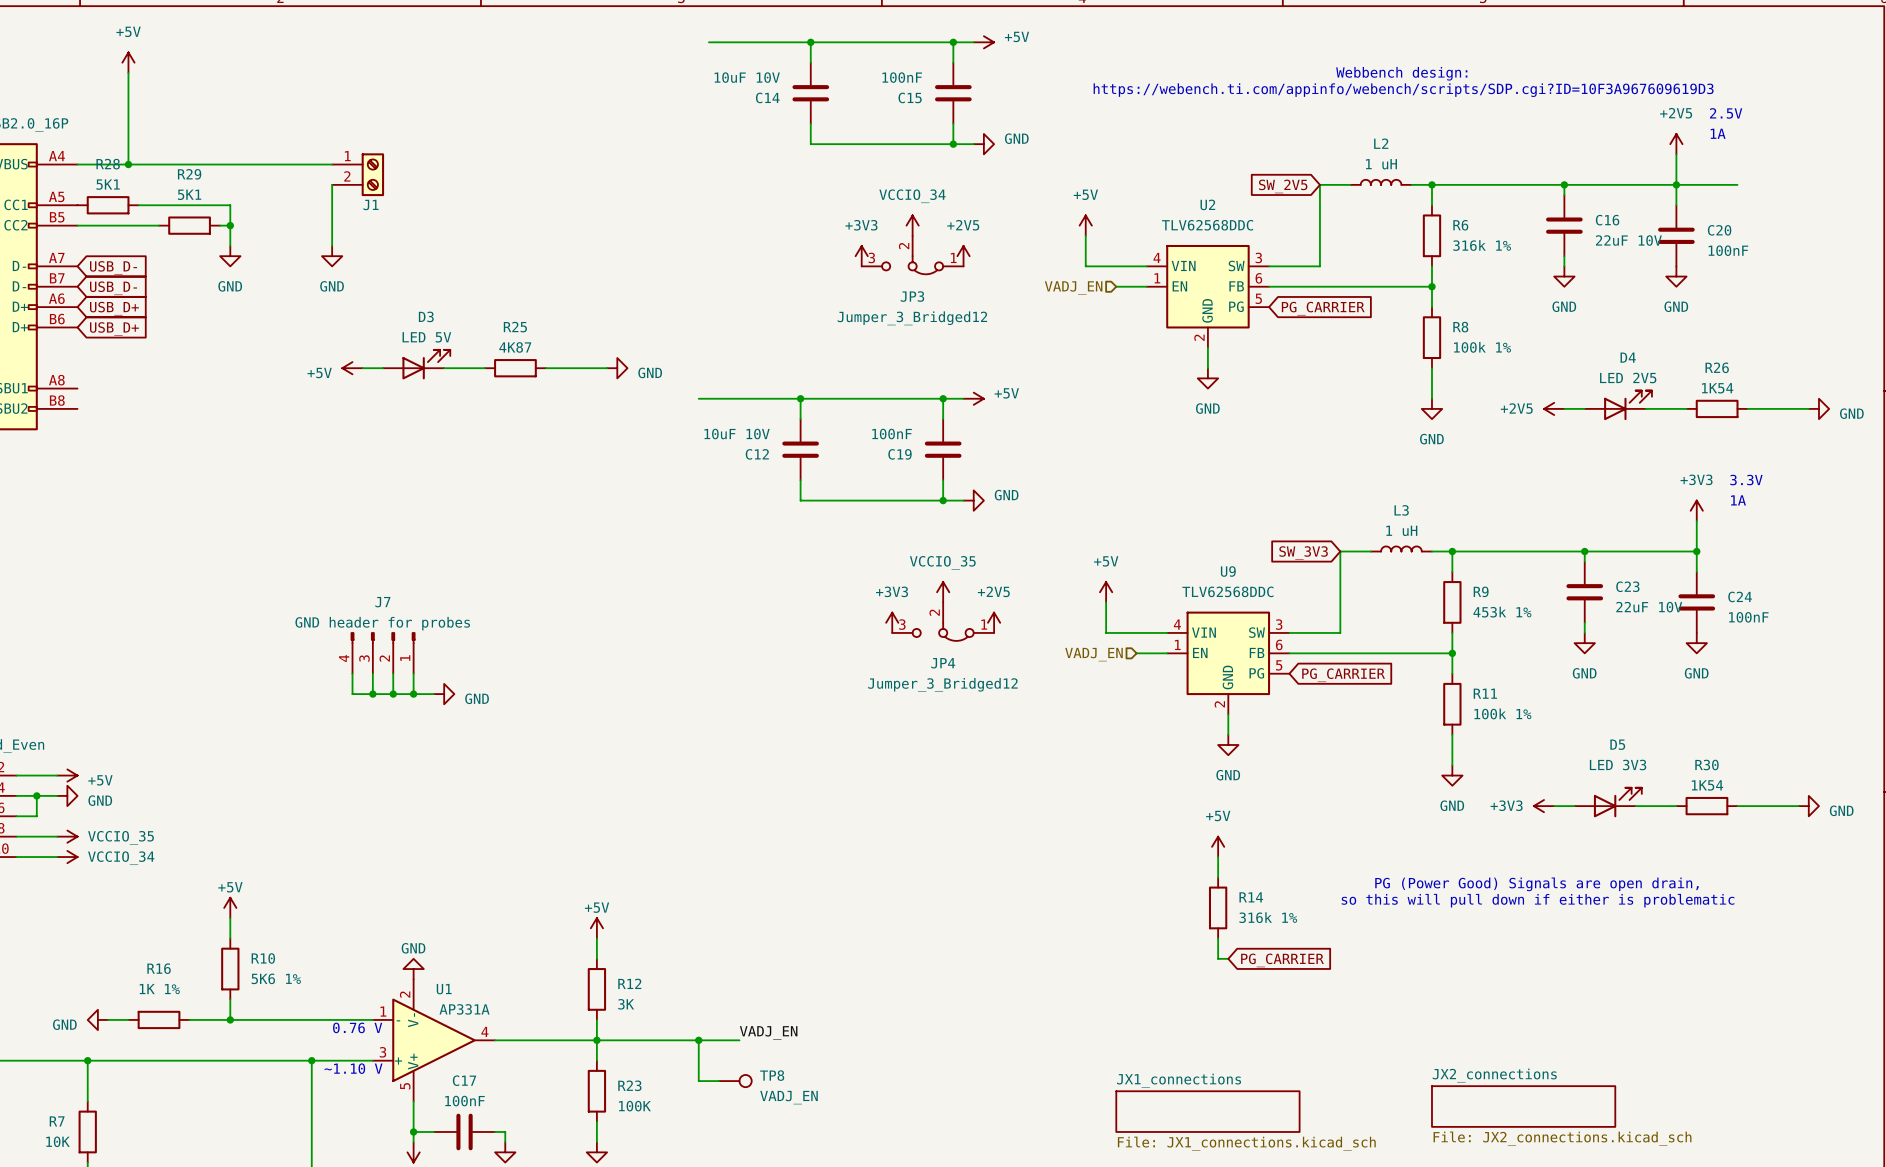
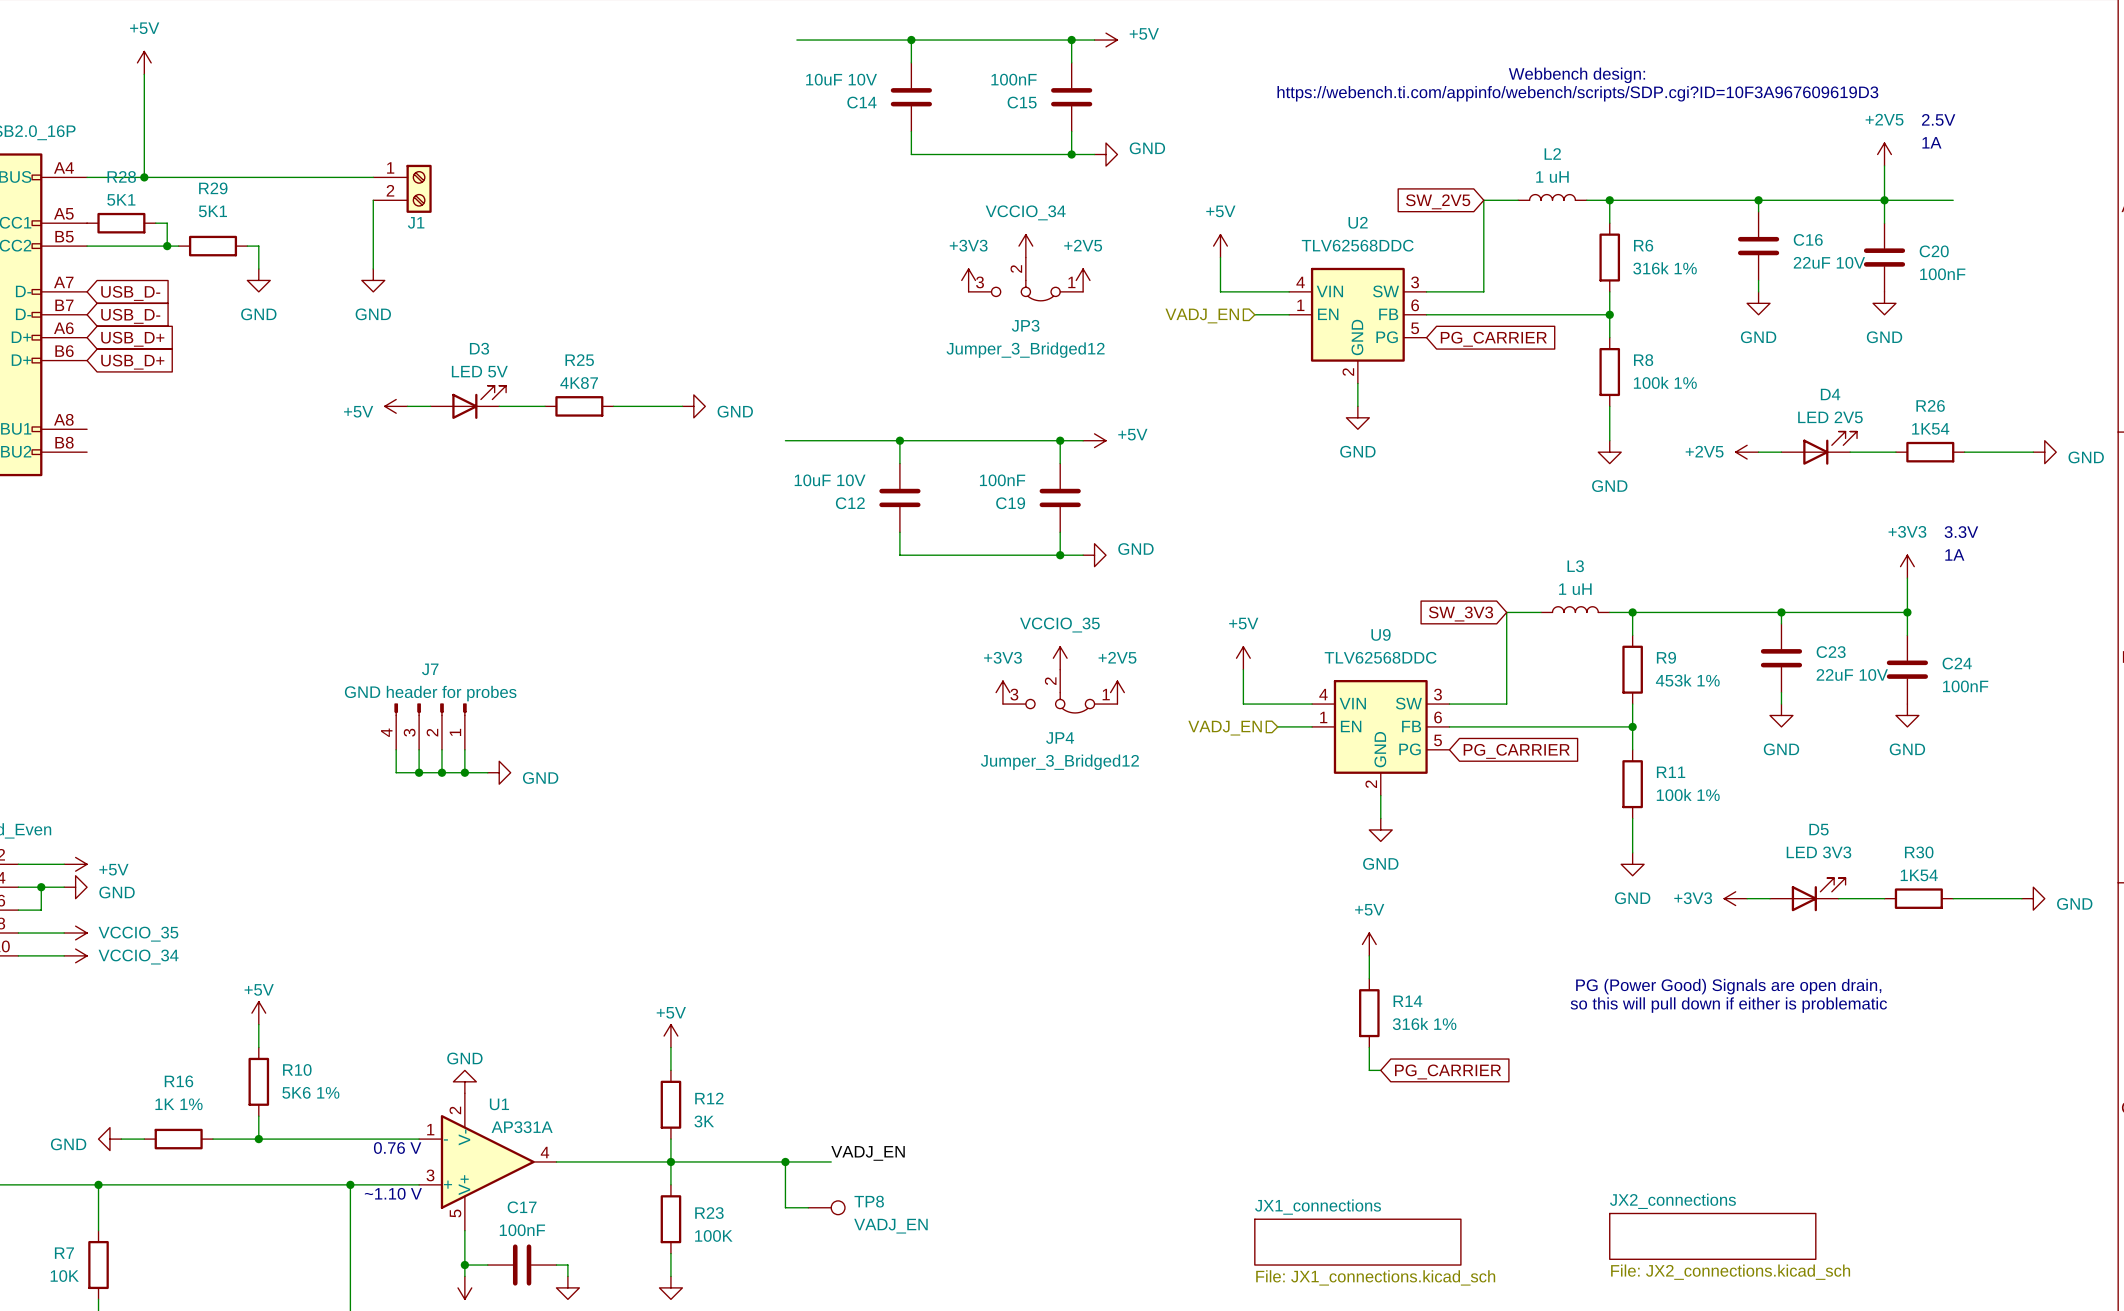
wire: (148, 205) (230, 205) (230, 225) -> (167, 223) (167, 246)
junction: none -> (167, 246)
junction: (230, 225) -> none

